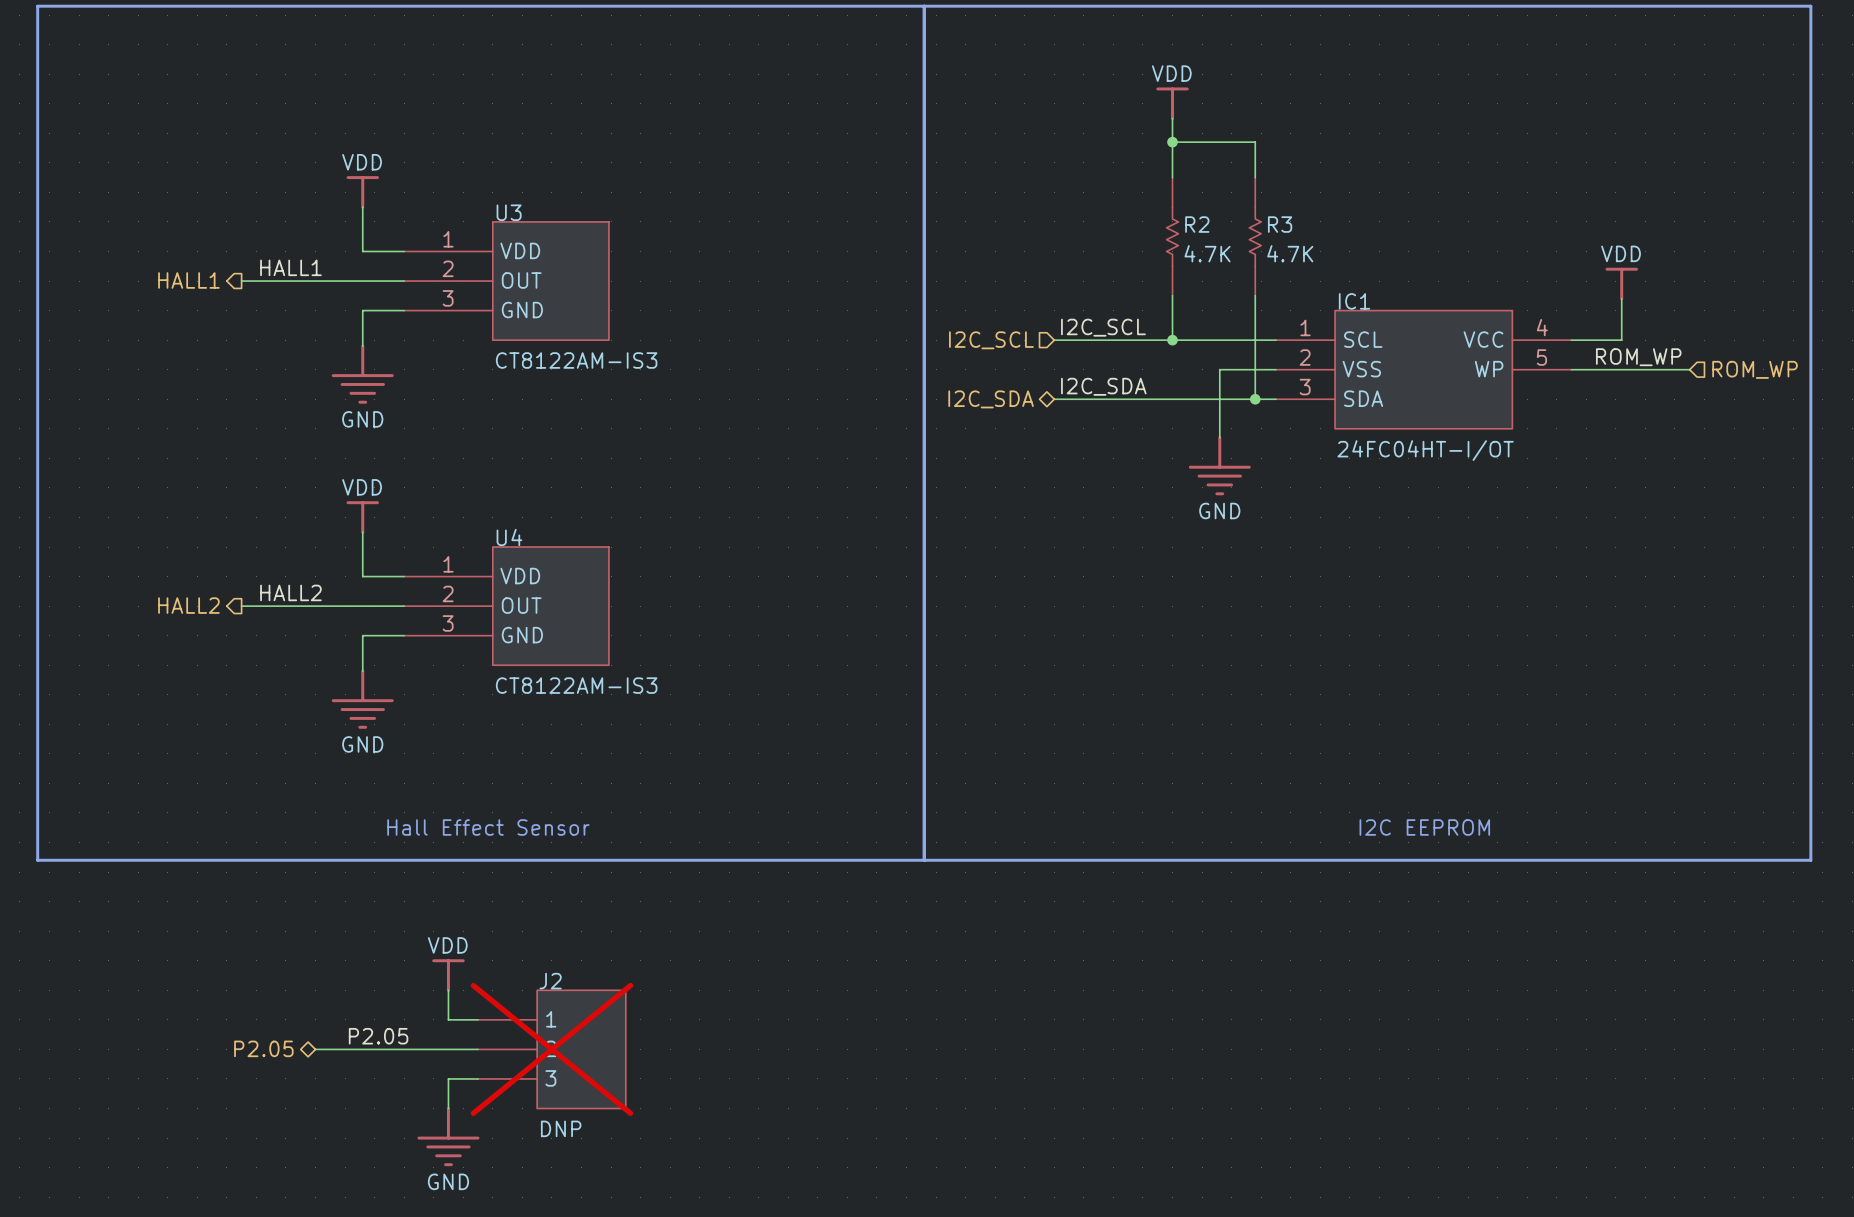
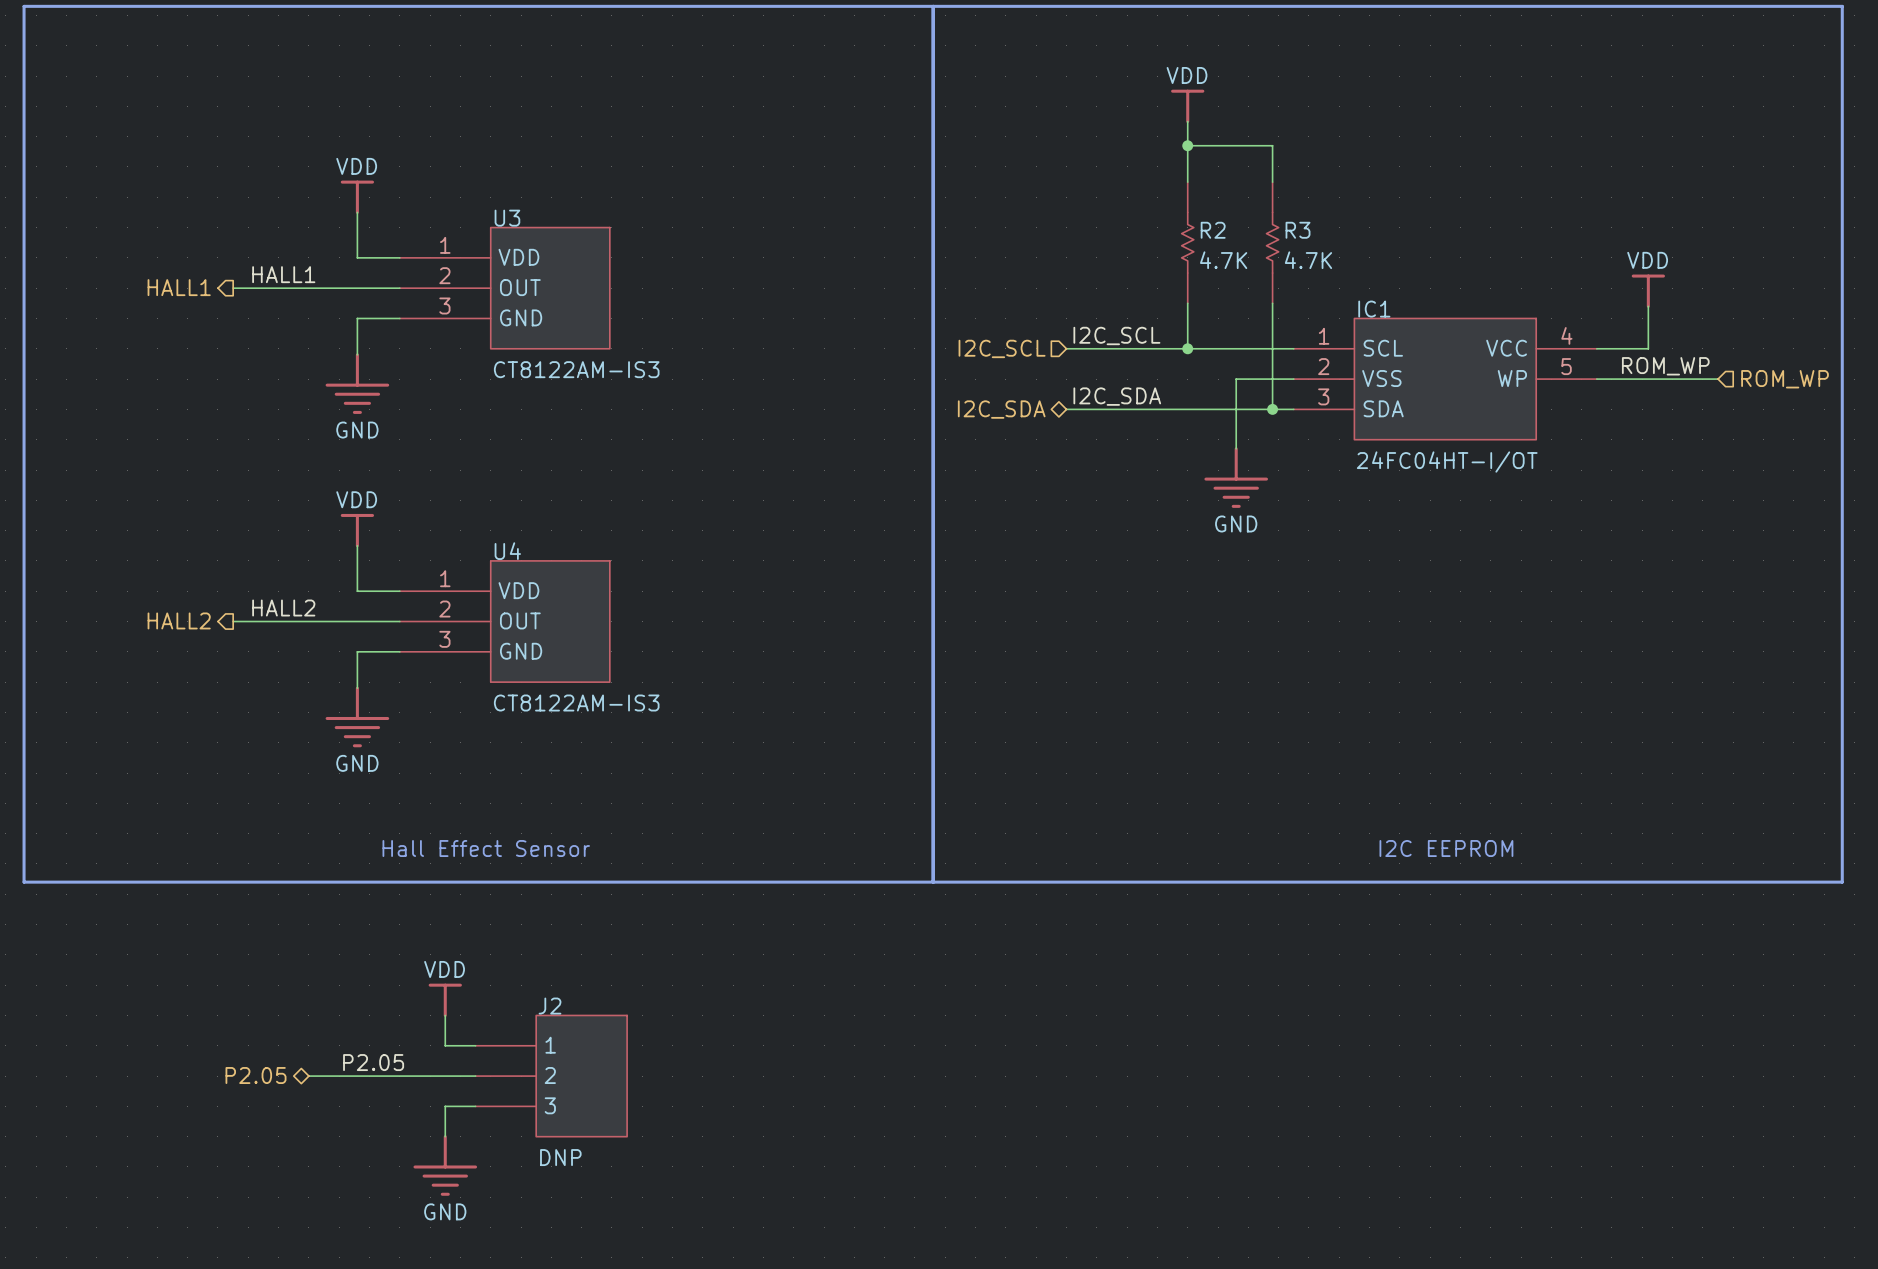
J2 do-not-place cross: (551, 1049) -> none

